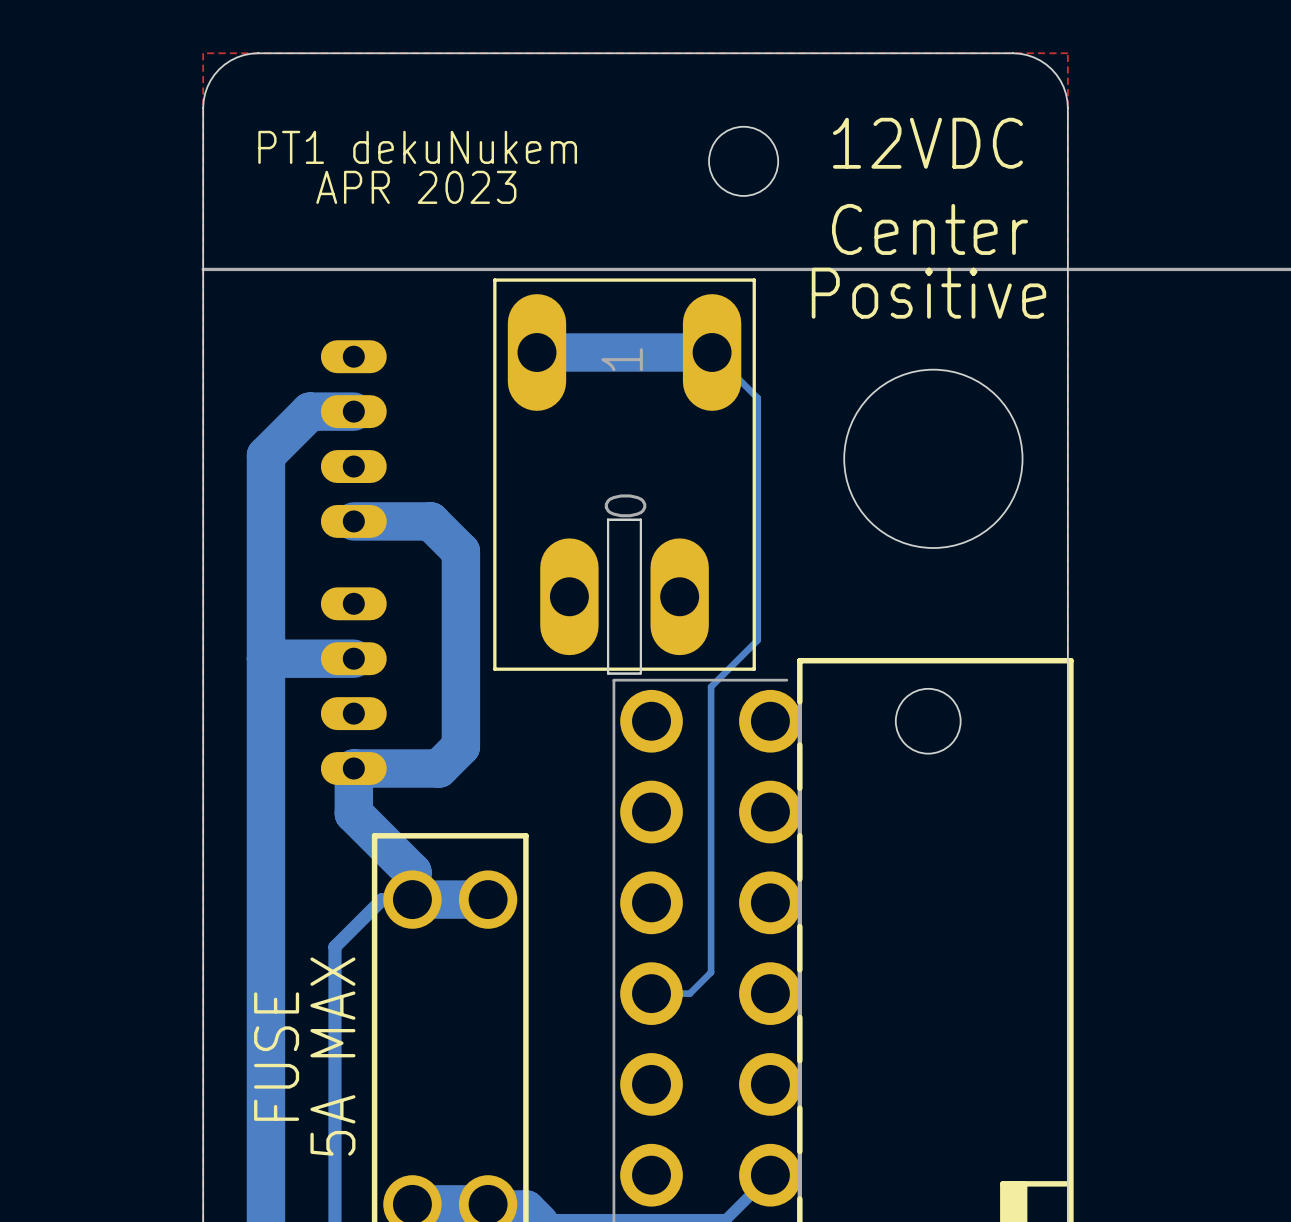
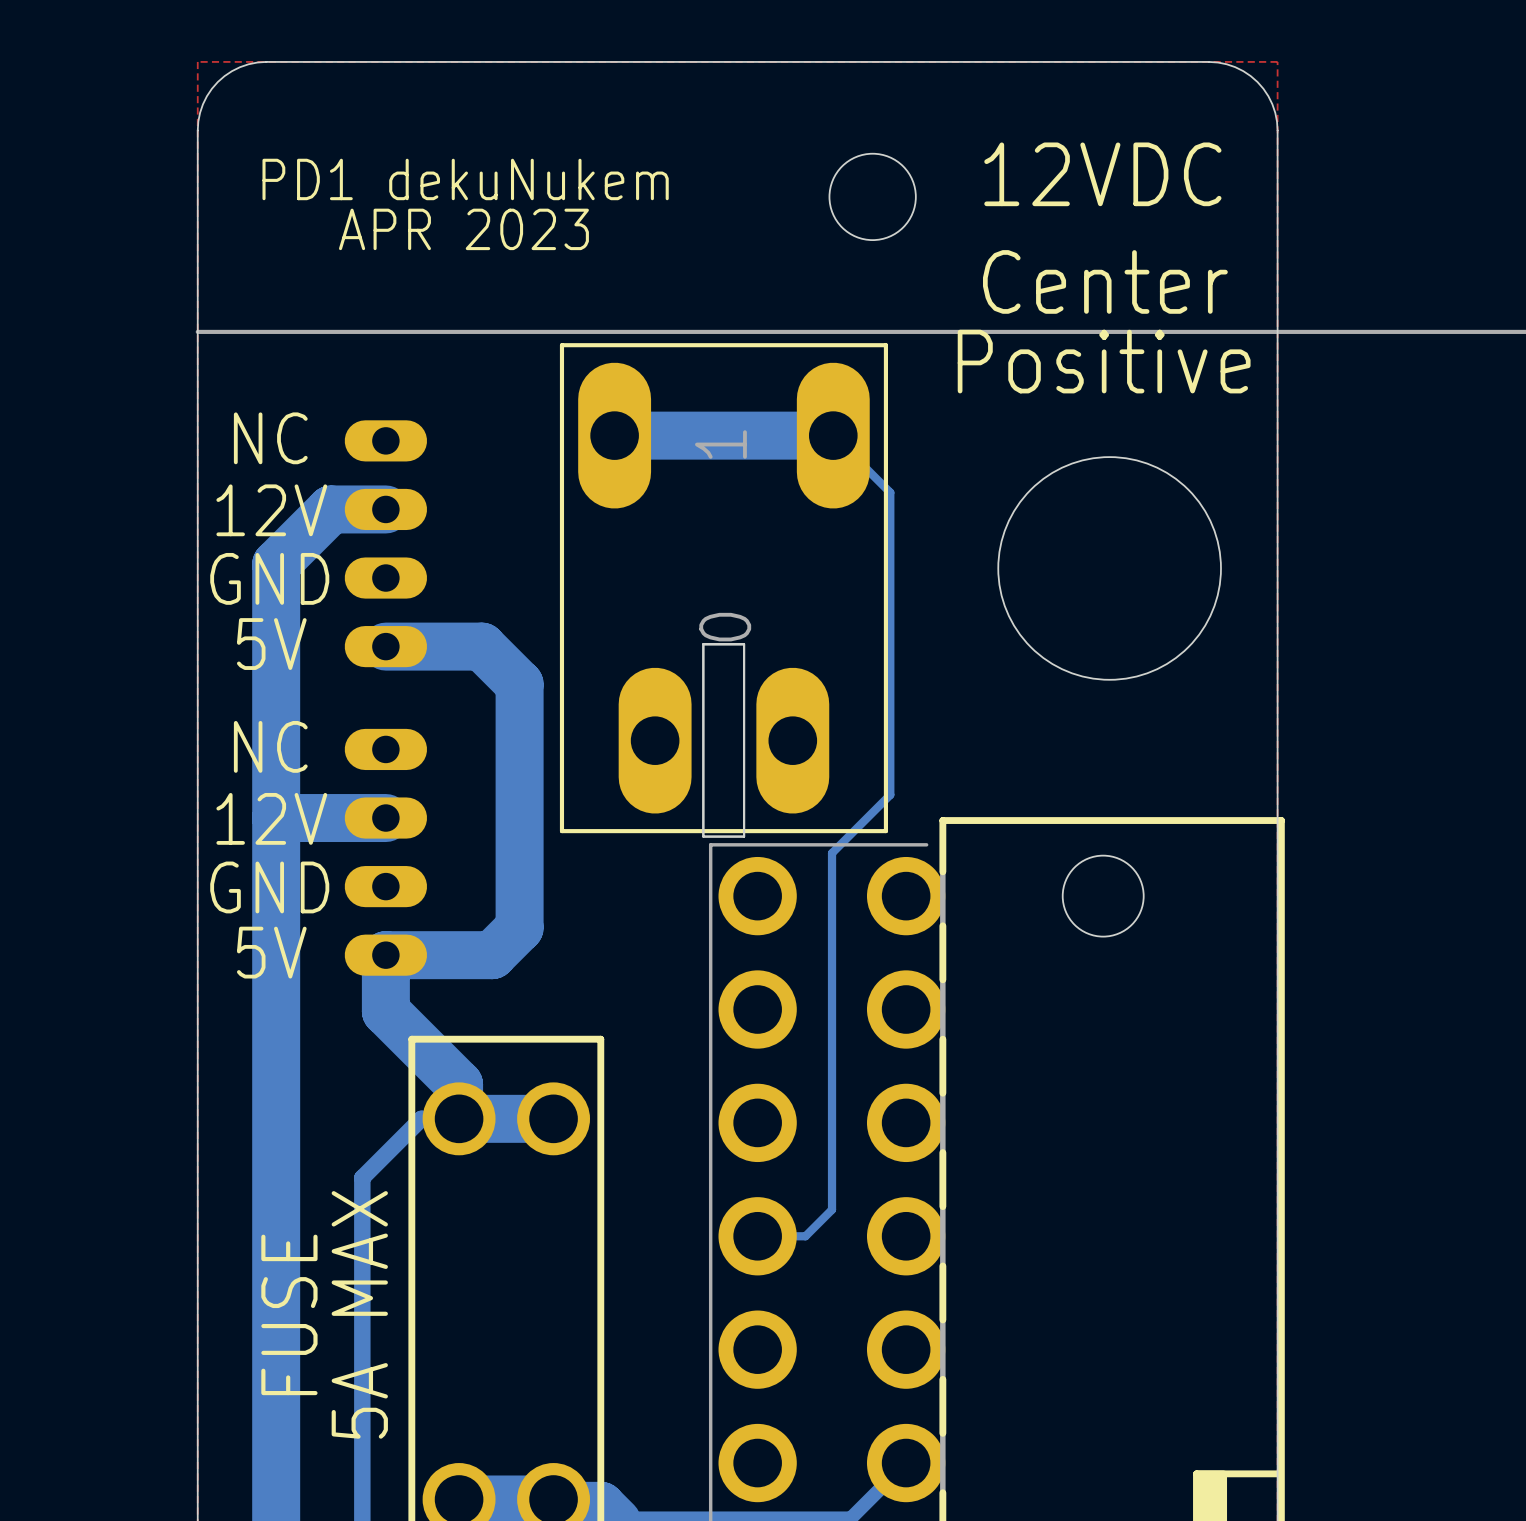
text: PT1 dekuNukem (417, 147) -> PD1 dekuNukem (465, 179)
text: none -> NC (270, 438)
text: none -> 12V (271, 510)
text: none -> GND (269, 578)
text: none -> 5V (271, 644)
text: none -> NC (270, 746)
text: none -> 12V (271, 818)
text: none -> GND (269, 887)
text: none -> 5V (271, 952)

